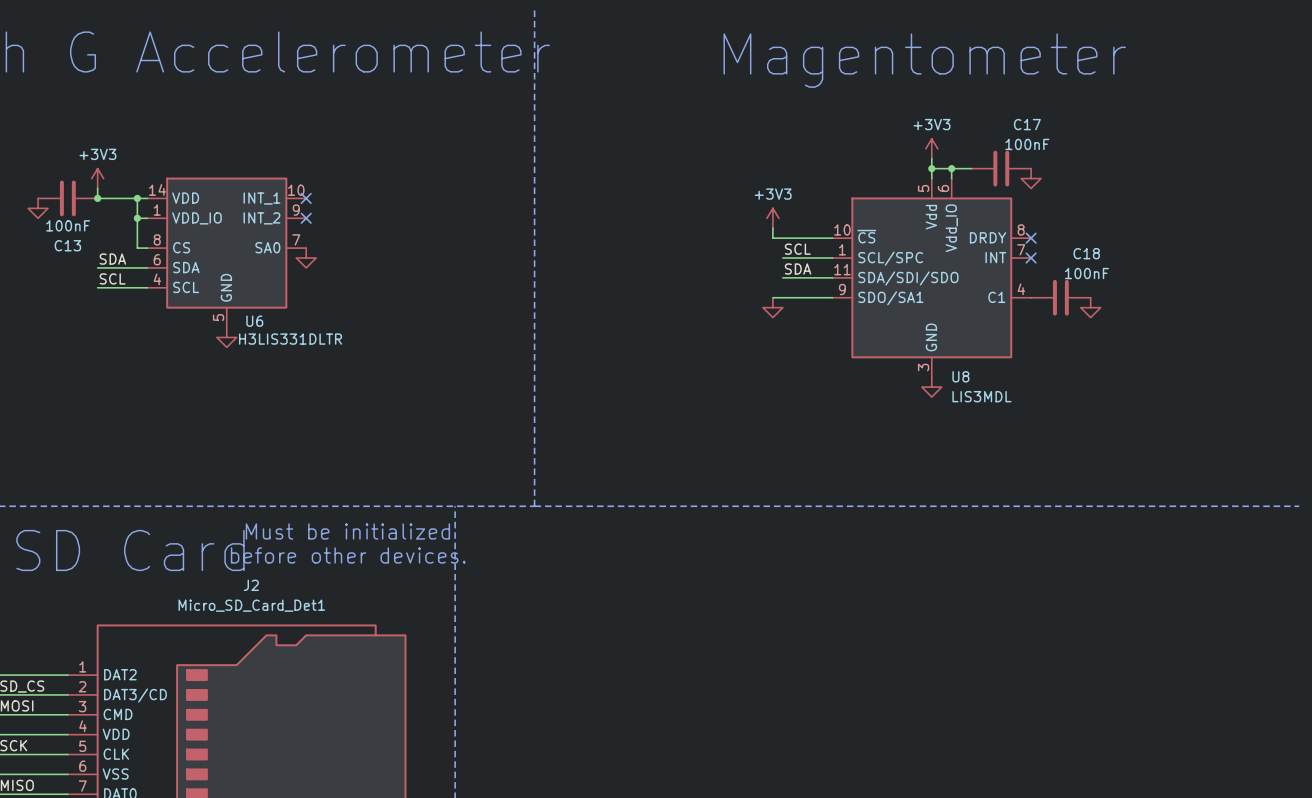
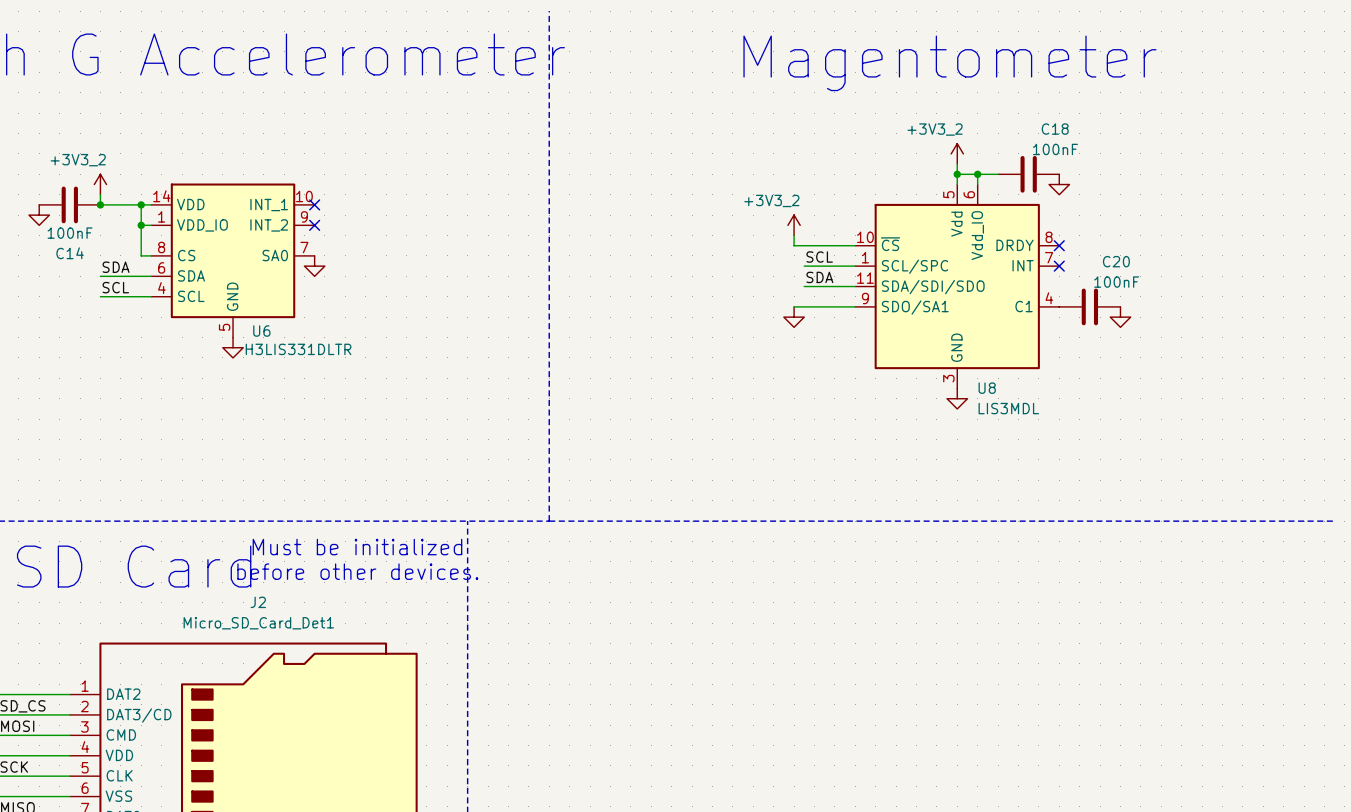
C17 name: C17 (1027, 124) -> C18 (1055, 129)
power symbol: +3V3 (931, 148) -> +3V3_2 (957, 153)
power symbol: +3V3 (97, 178) -> +3V3_2 (100, 184)
power symbol: +3V3 (772, 218) -> +3V3_2 (794, 225)
C13 name: C13 (67, 245) -> C14 (70, 253)
C18 name: C18 (1086, 253) -> C20 (1116, 261)

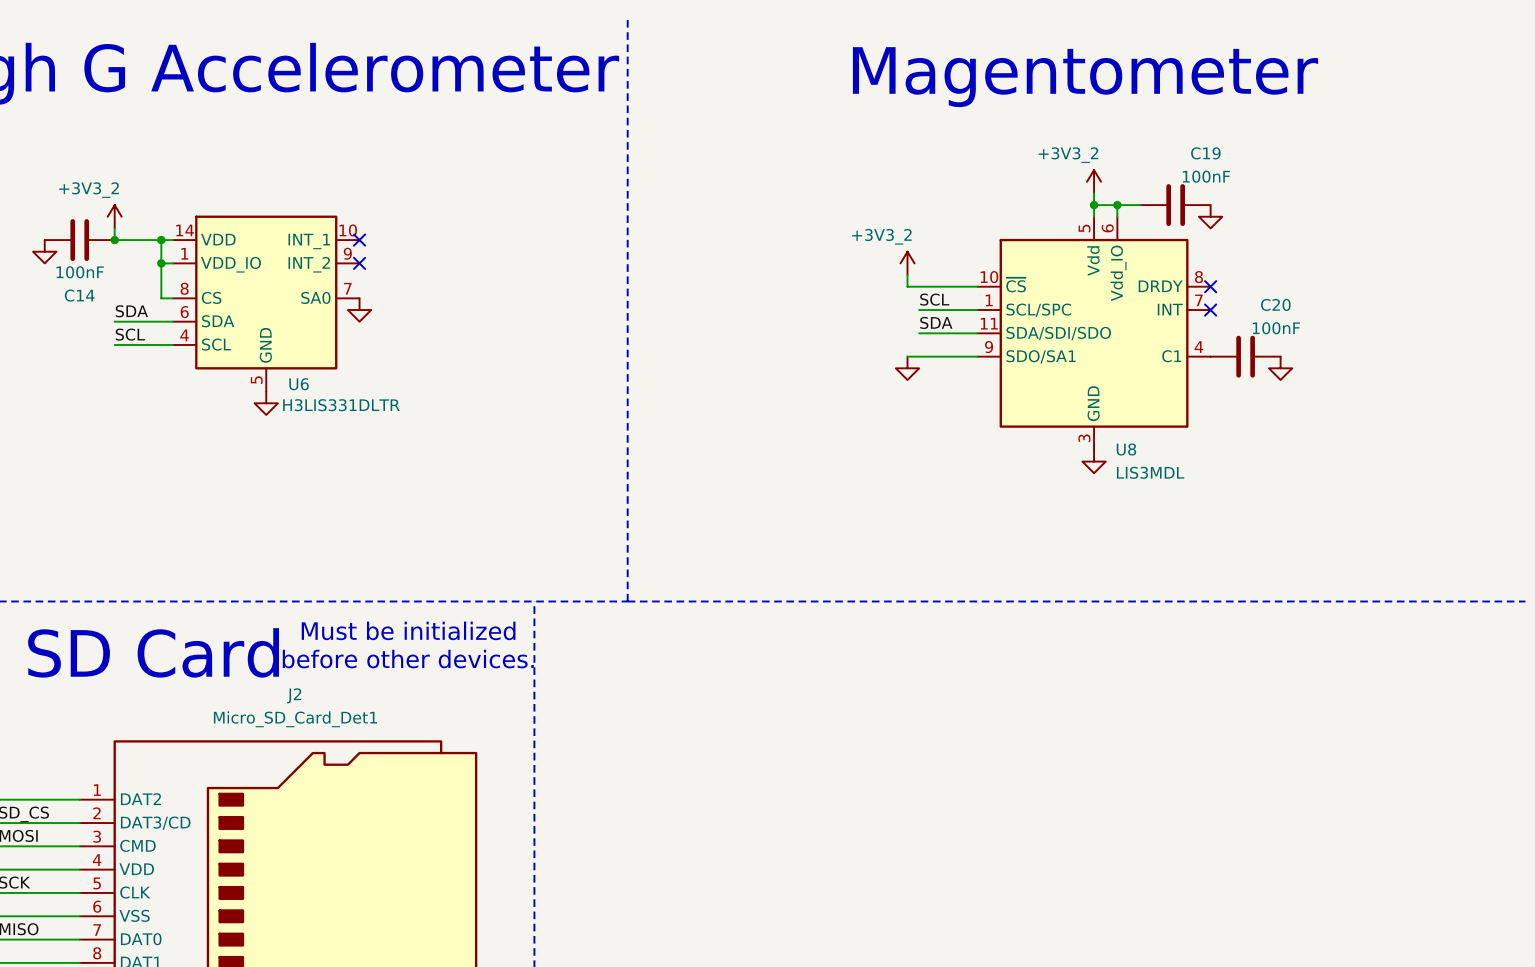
C18 name: C18 (1055, 129) -> C19 (1205, 153)

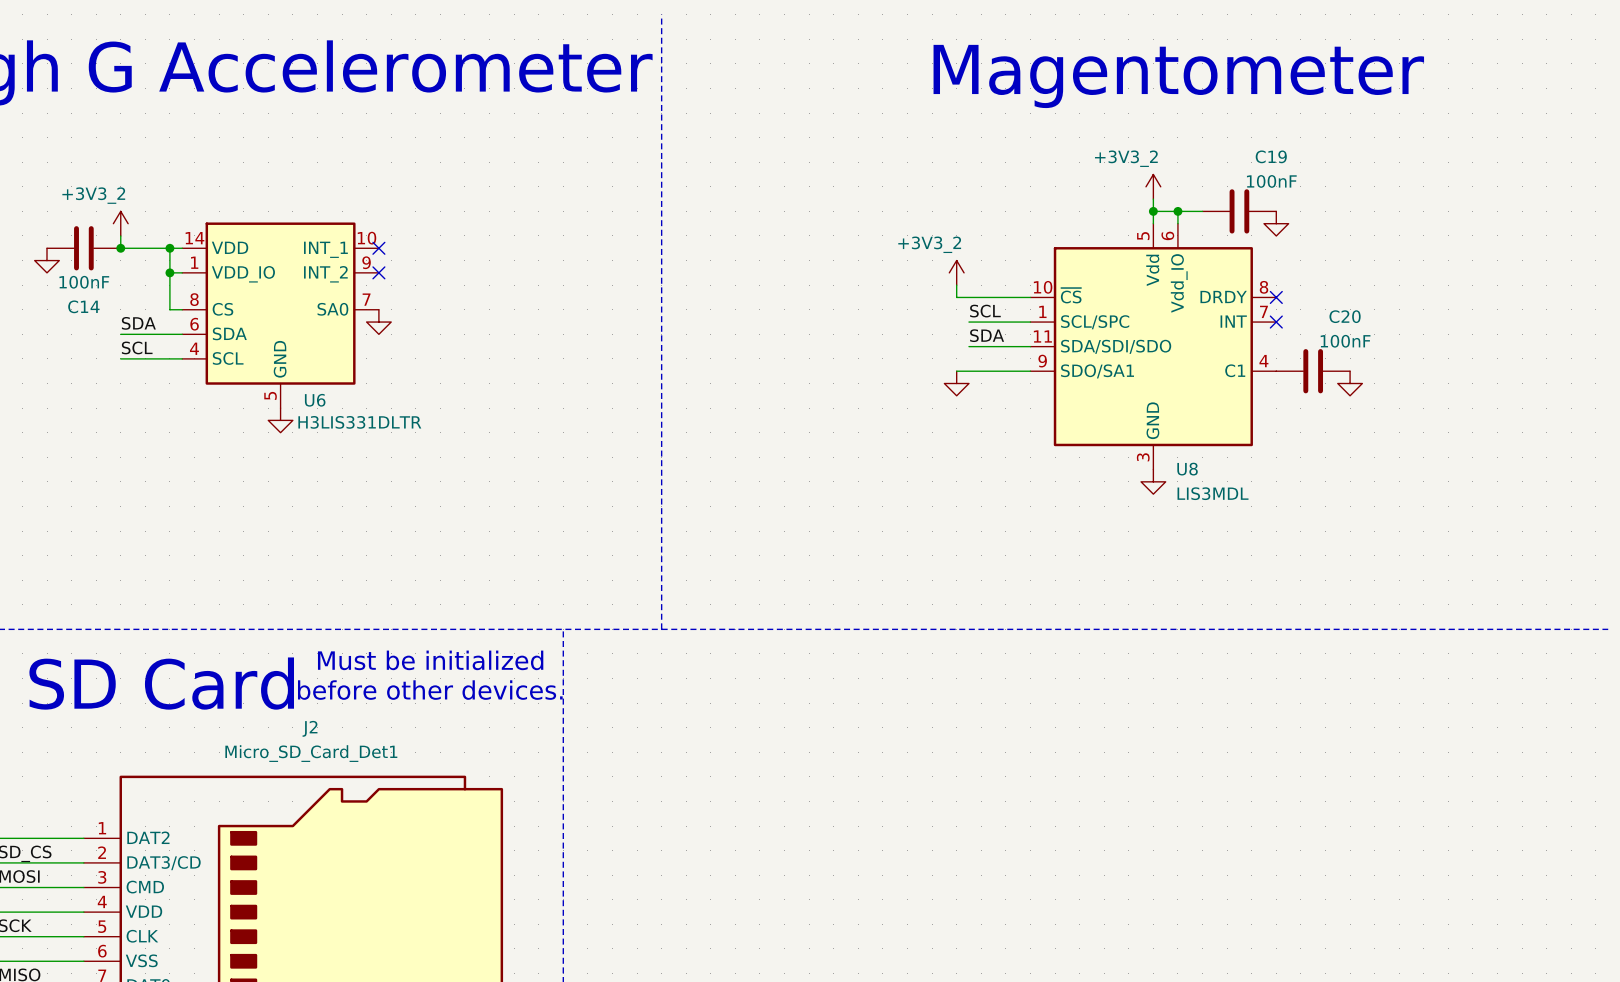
text position: Magentometer (1085, 77) -> Magentometer (1178, 76)

